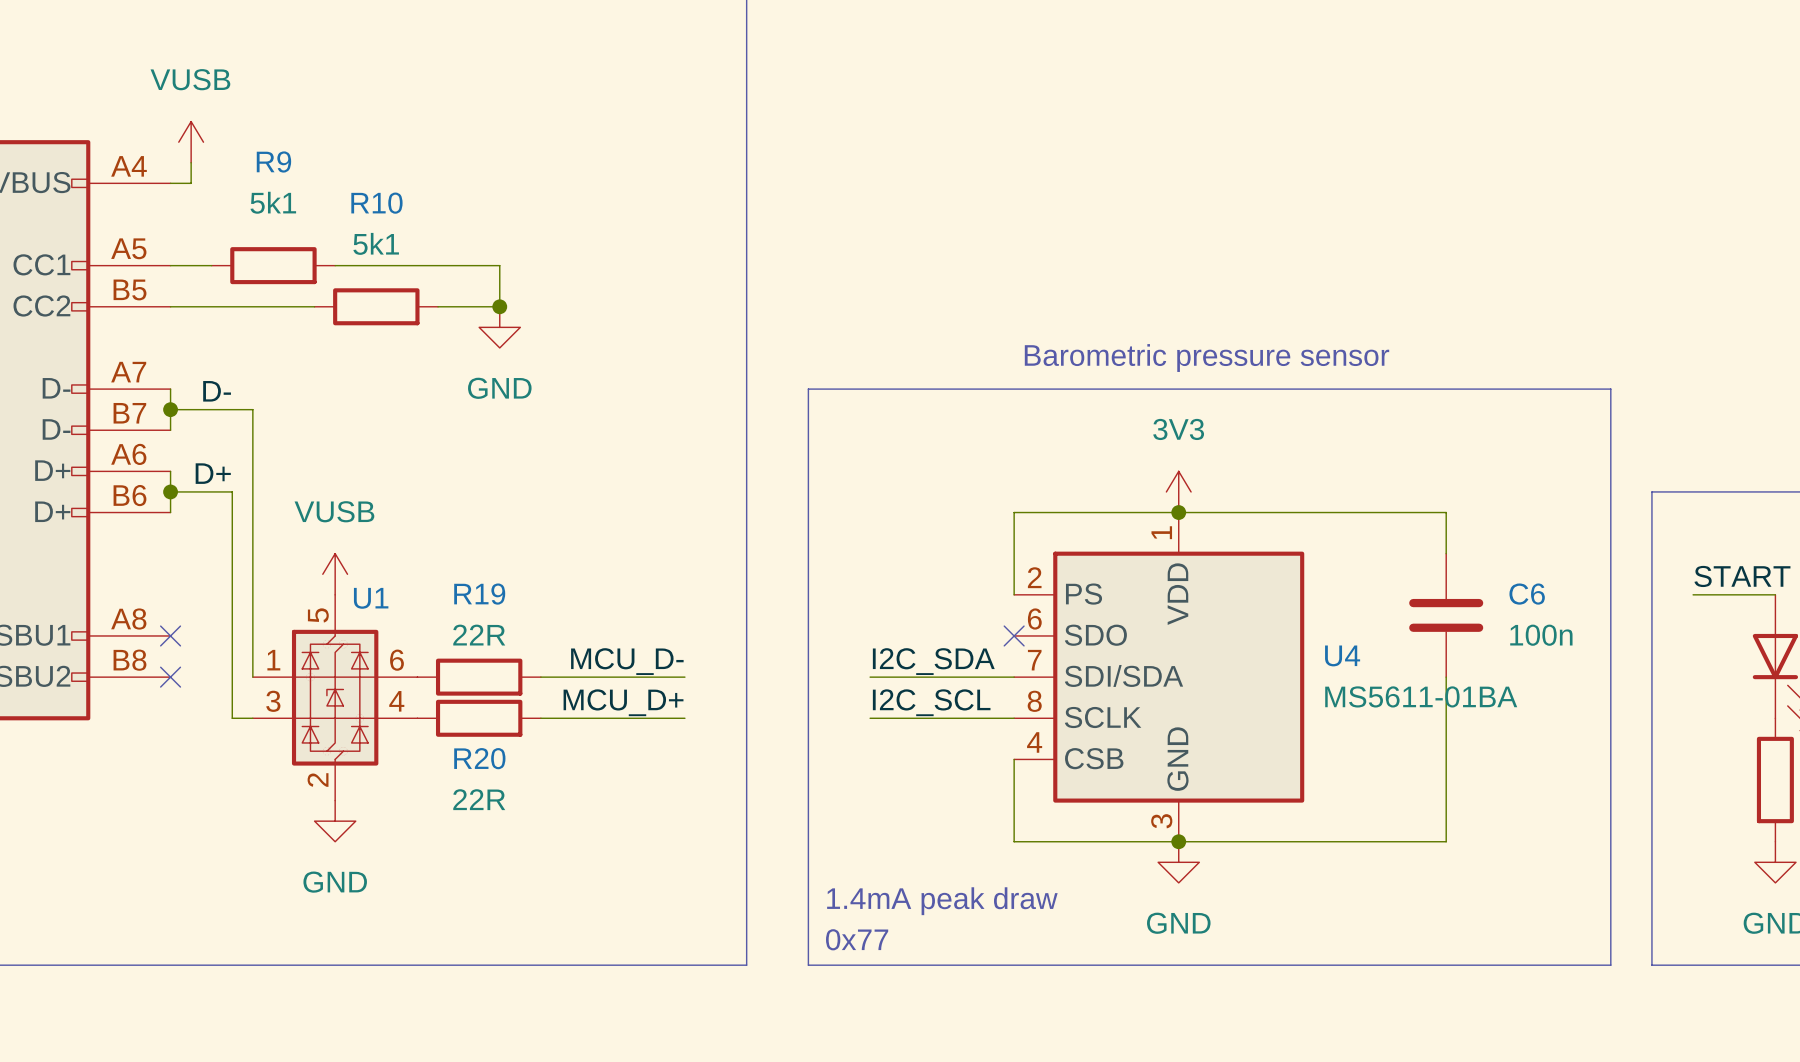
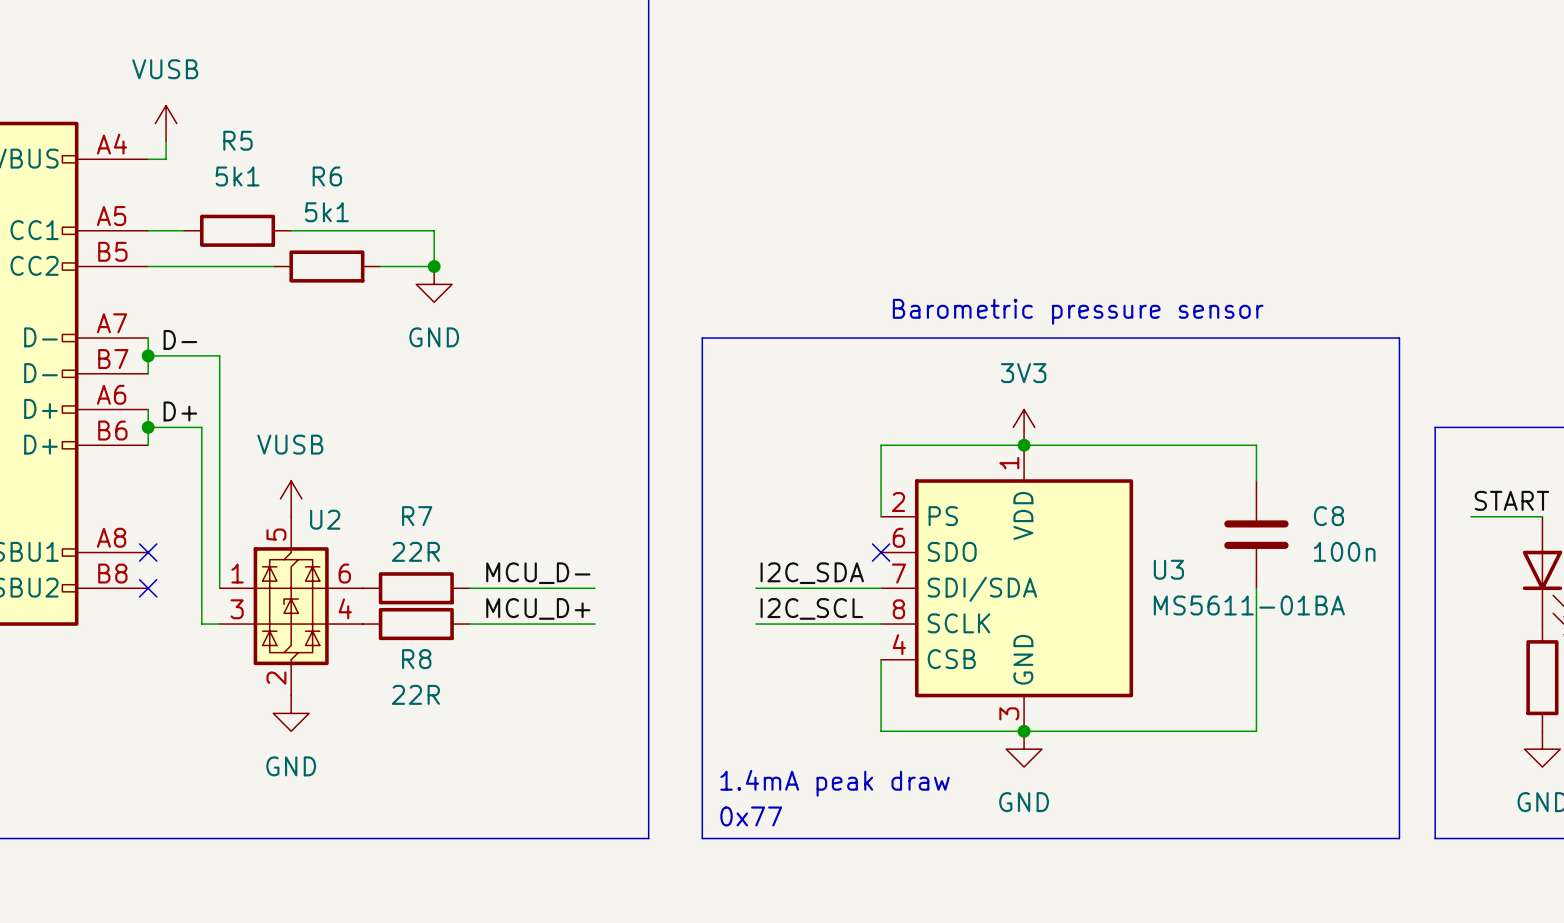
R9 name: R9 (273, 161) -> R5 (237, 140)
R10 name: R10 (376, 203) -> R6 (327, 176)
R19 name: R19 (479, 594) -> R7 (417, 516)
C6 name: C6 (1527, 594) -> C8 (1328, 516)
U1 name: U1 (371, 598) -> U2 (325, 519)
U4 name: U4 (1342, 655) -> U3 (1168, 569)
R20 name: R20 (479, 758) -> R8 (416, 659)

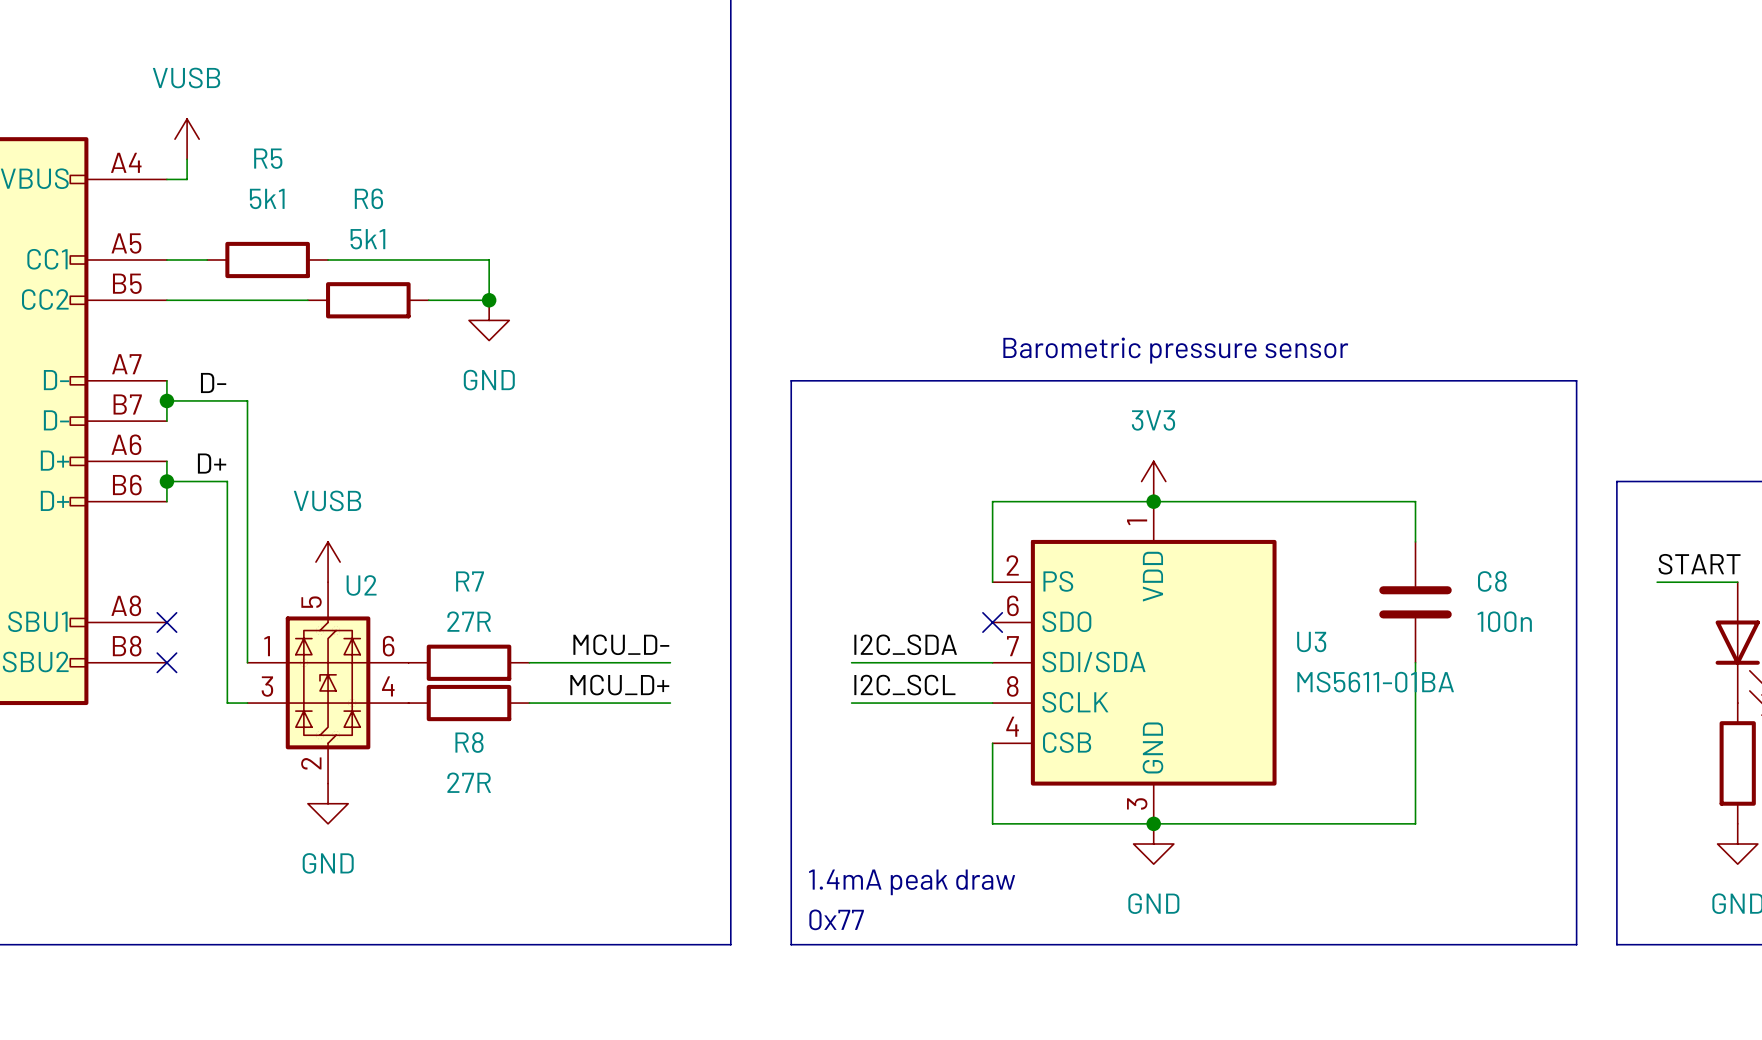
R7 value: 22R (415, 551) -> 27R (469, 621)
R8 value: 22R (415, 694) -> 27R (469, 782)

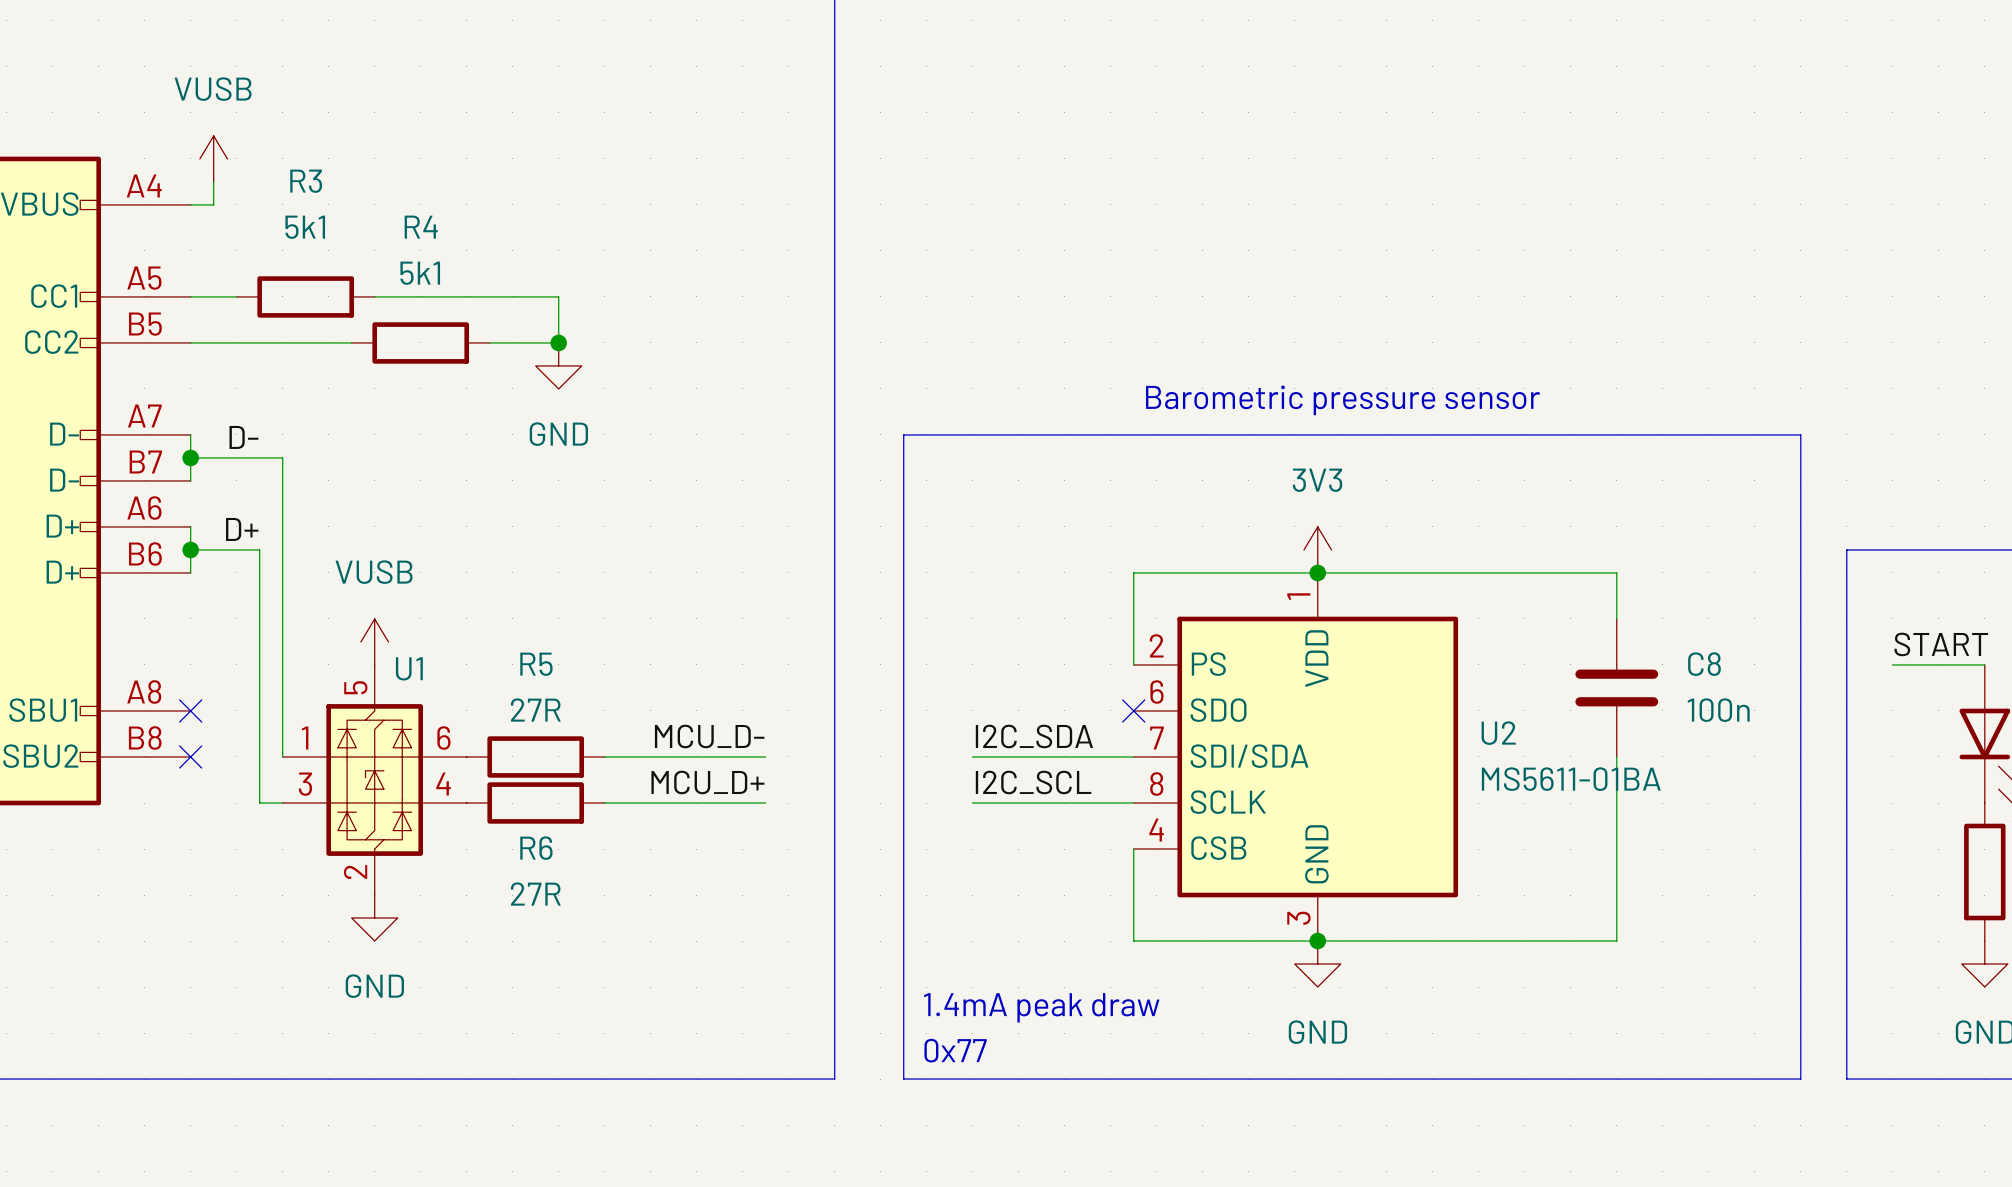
R5 name: R5 (268, 158) -> R3 (306, 181)
R6 name: R6 (368, 198) -> R4 (421, 227)
R7 name: R7 (470, 581) -> R5 (536, 664)
U2 name: U2 (361, 585) -> U1 (409, 668)
U3 name: U3 (1311, 641) -> U2 (1498, 733)
R8 name: R8 (469, 742) -> R6 (536, 848)

